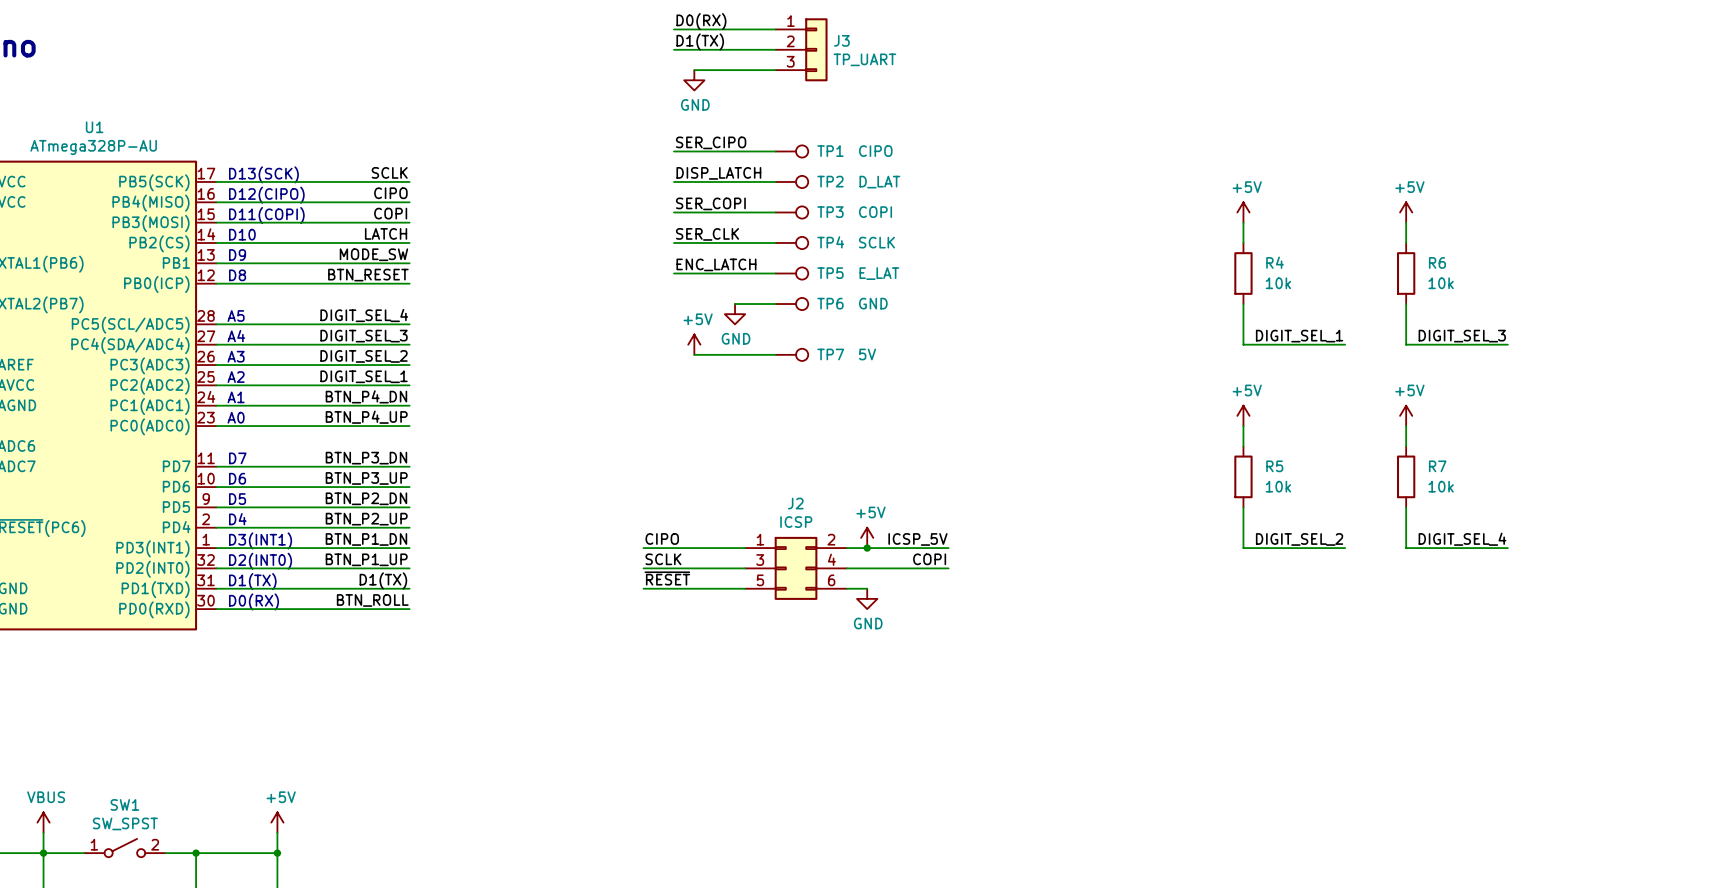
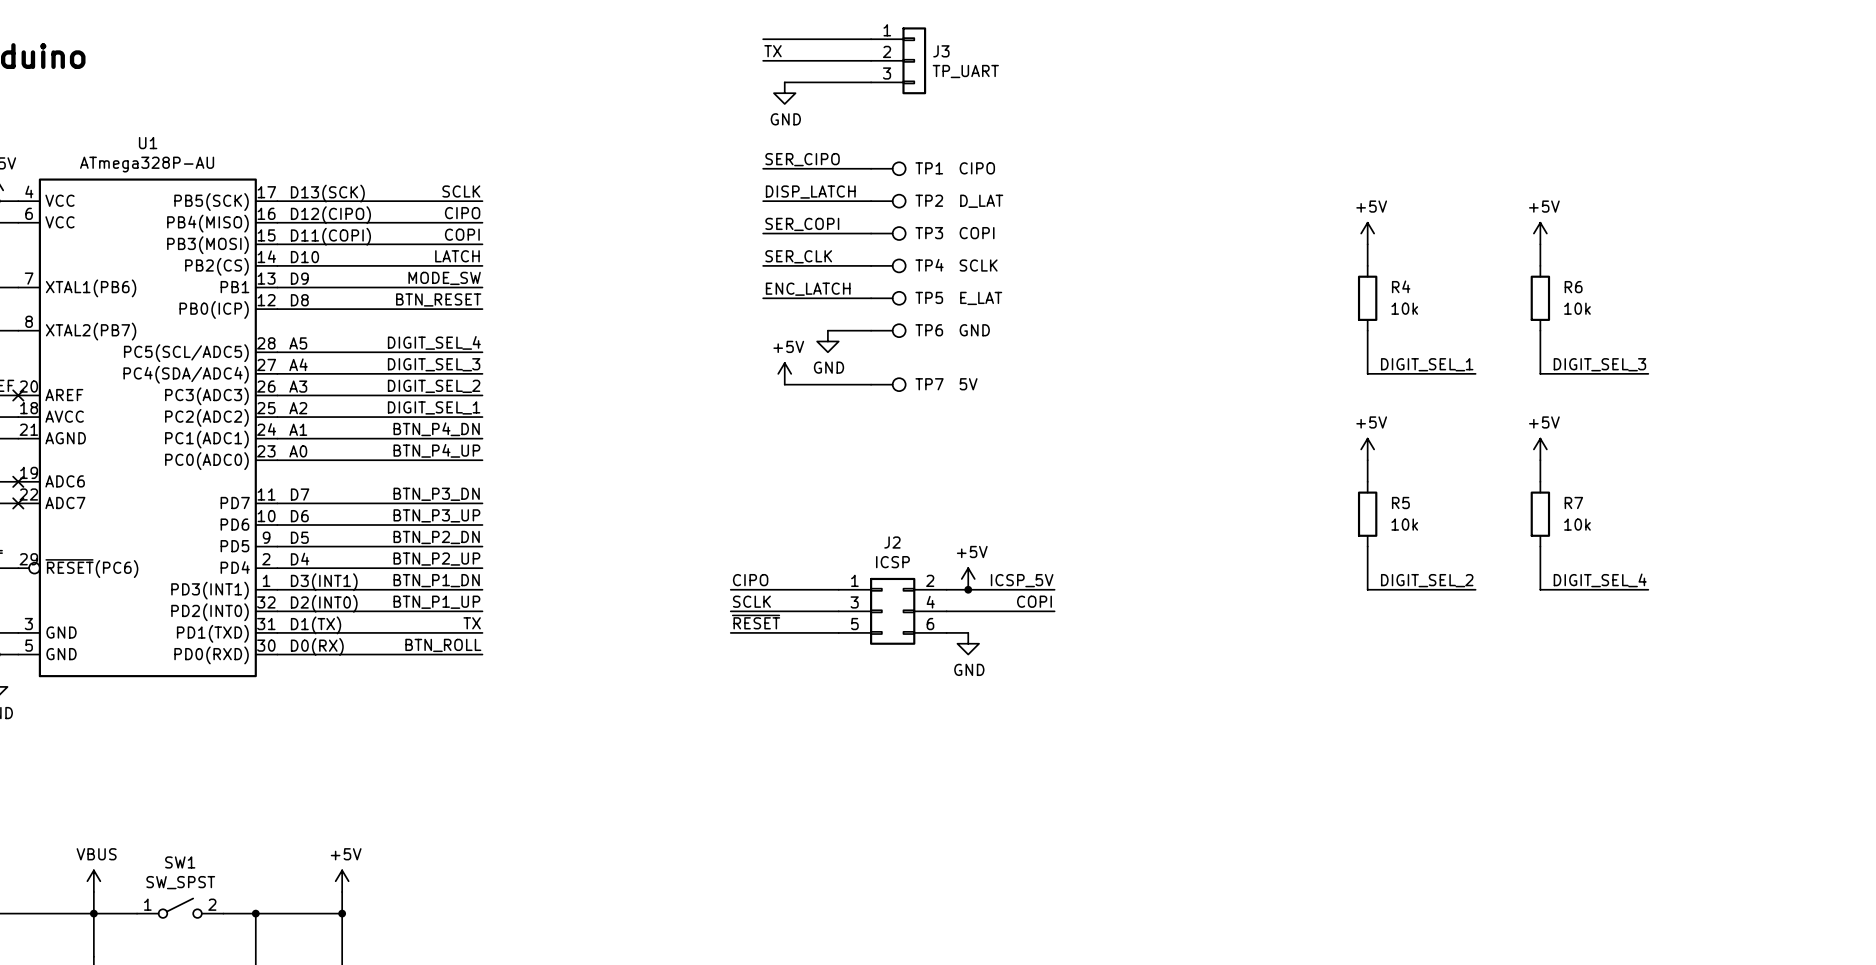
label: D0(RX) (701, 21) -> none
label: D1(TX) (700, 41) -> TX (773, 51)
label: D1(TX) (383, 580) -> TX (472, 623)

